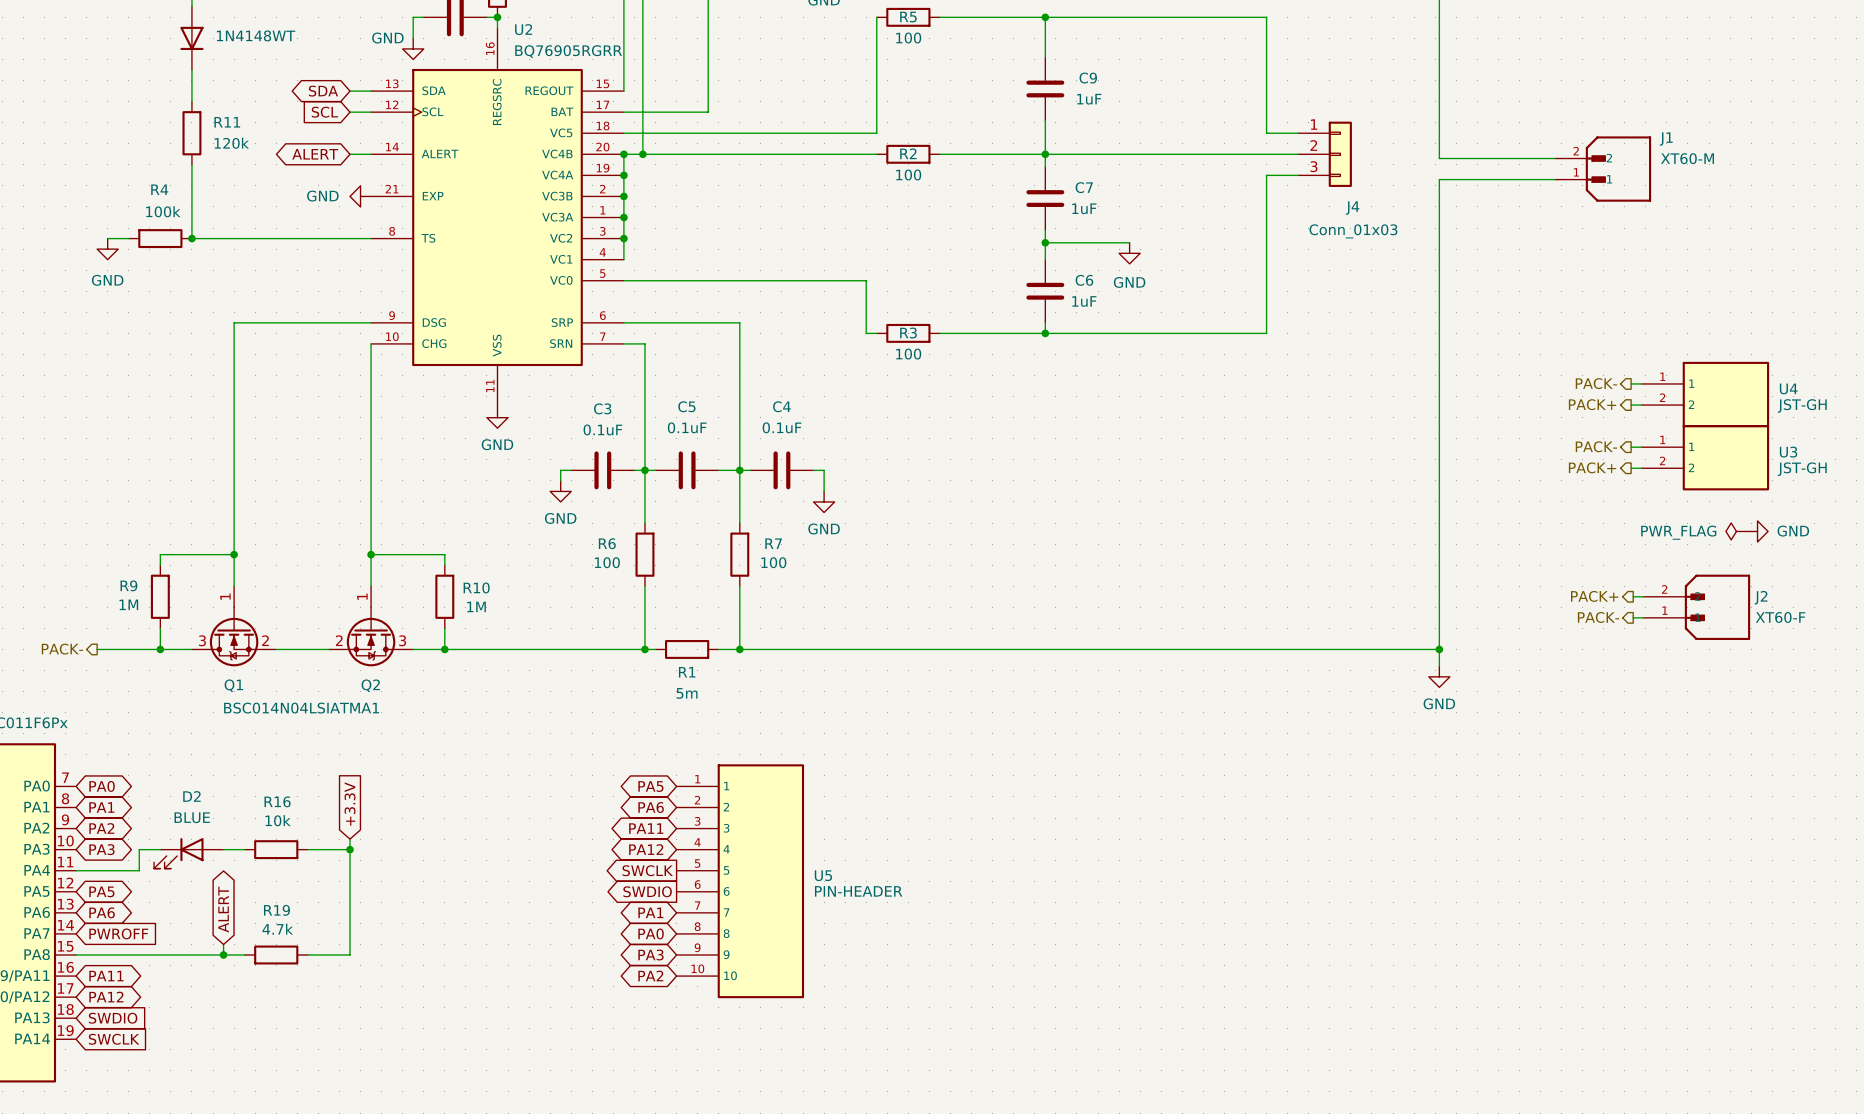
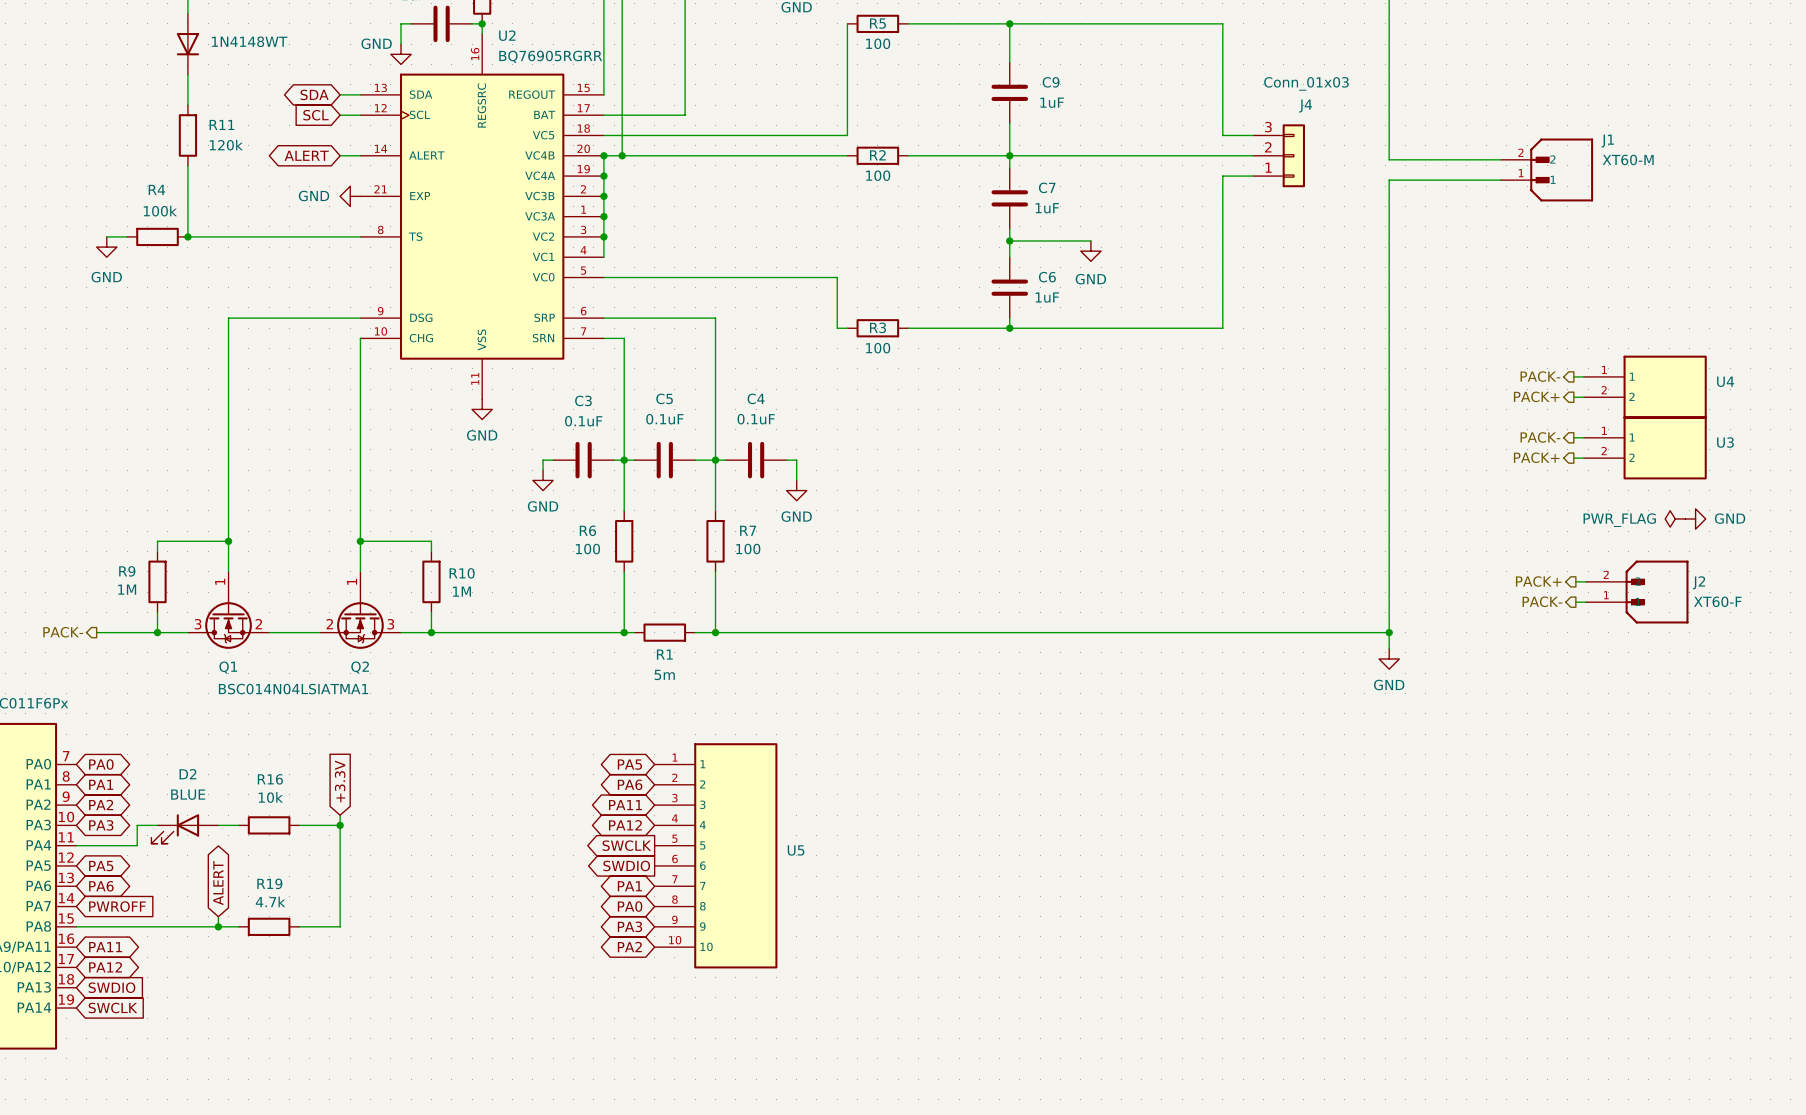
J4 flip: as is (1340, 154) -> up-down (1293, 155)
U4 value: JST-GH (1802, 406) -> none
U3 value: JST-GH (1802, 469) -> none
U5 value: PIN-HEADER (858, 891) -> none

